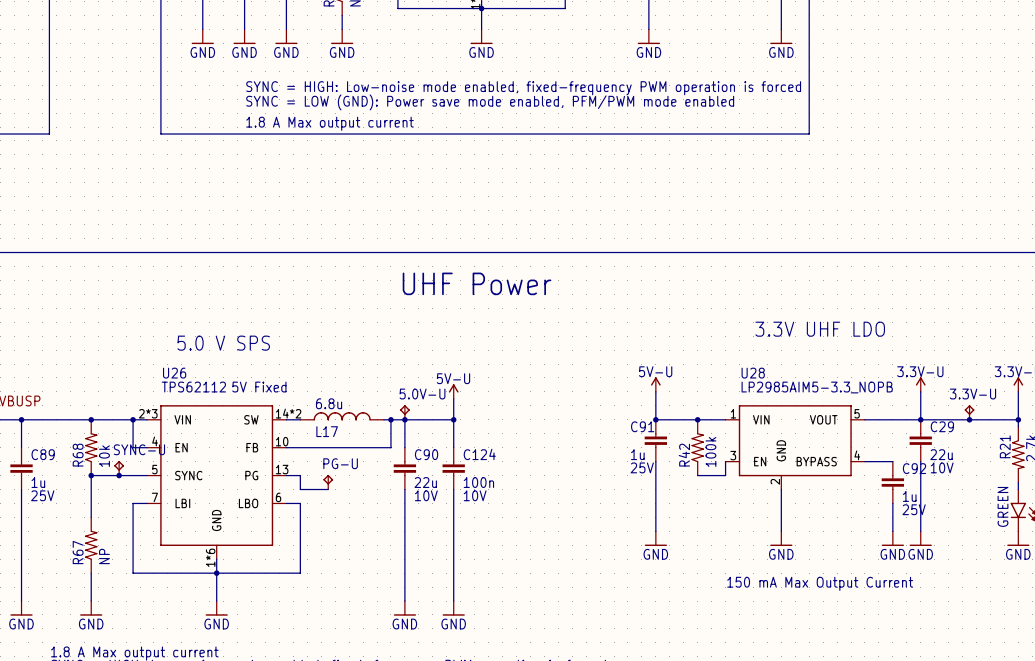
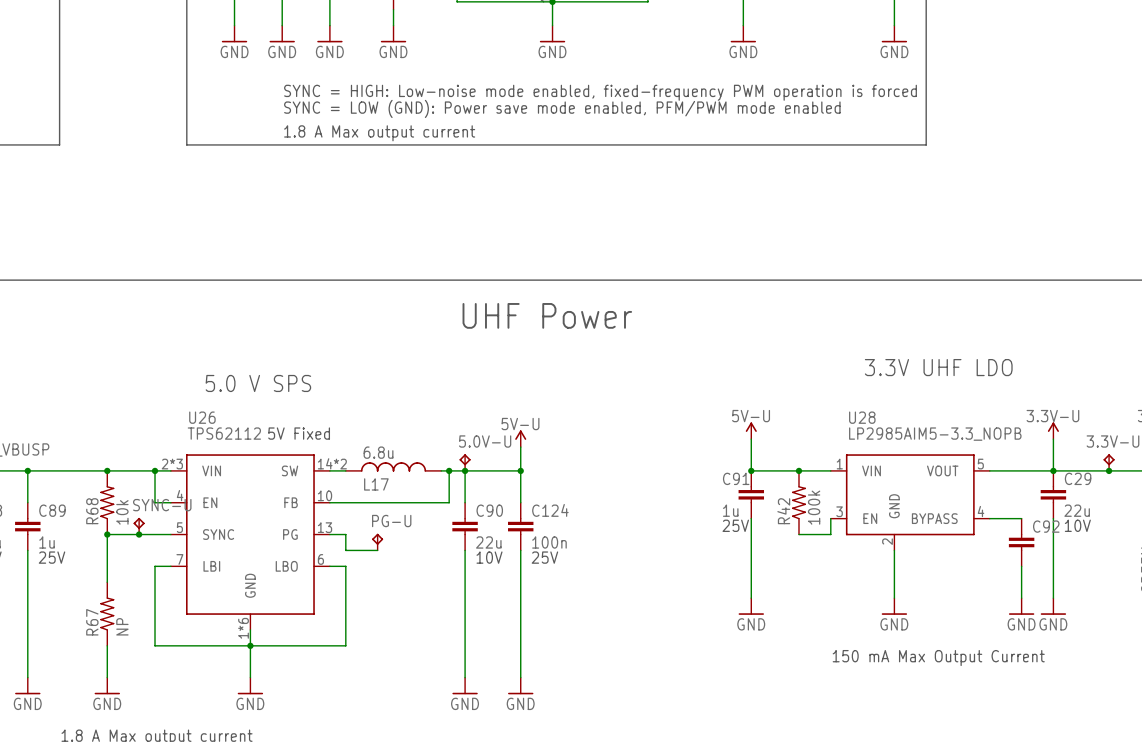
C124 text: 10V (475, 495) -> 25V (544, 557)
C92 value: 1u (909, 496) -> none
C92 text: 25V (914, 509) -> none

